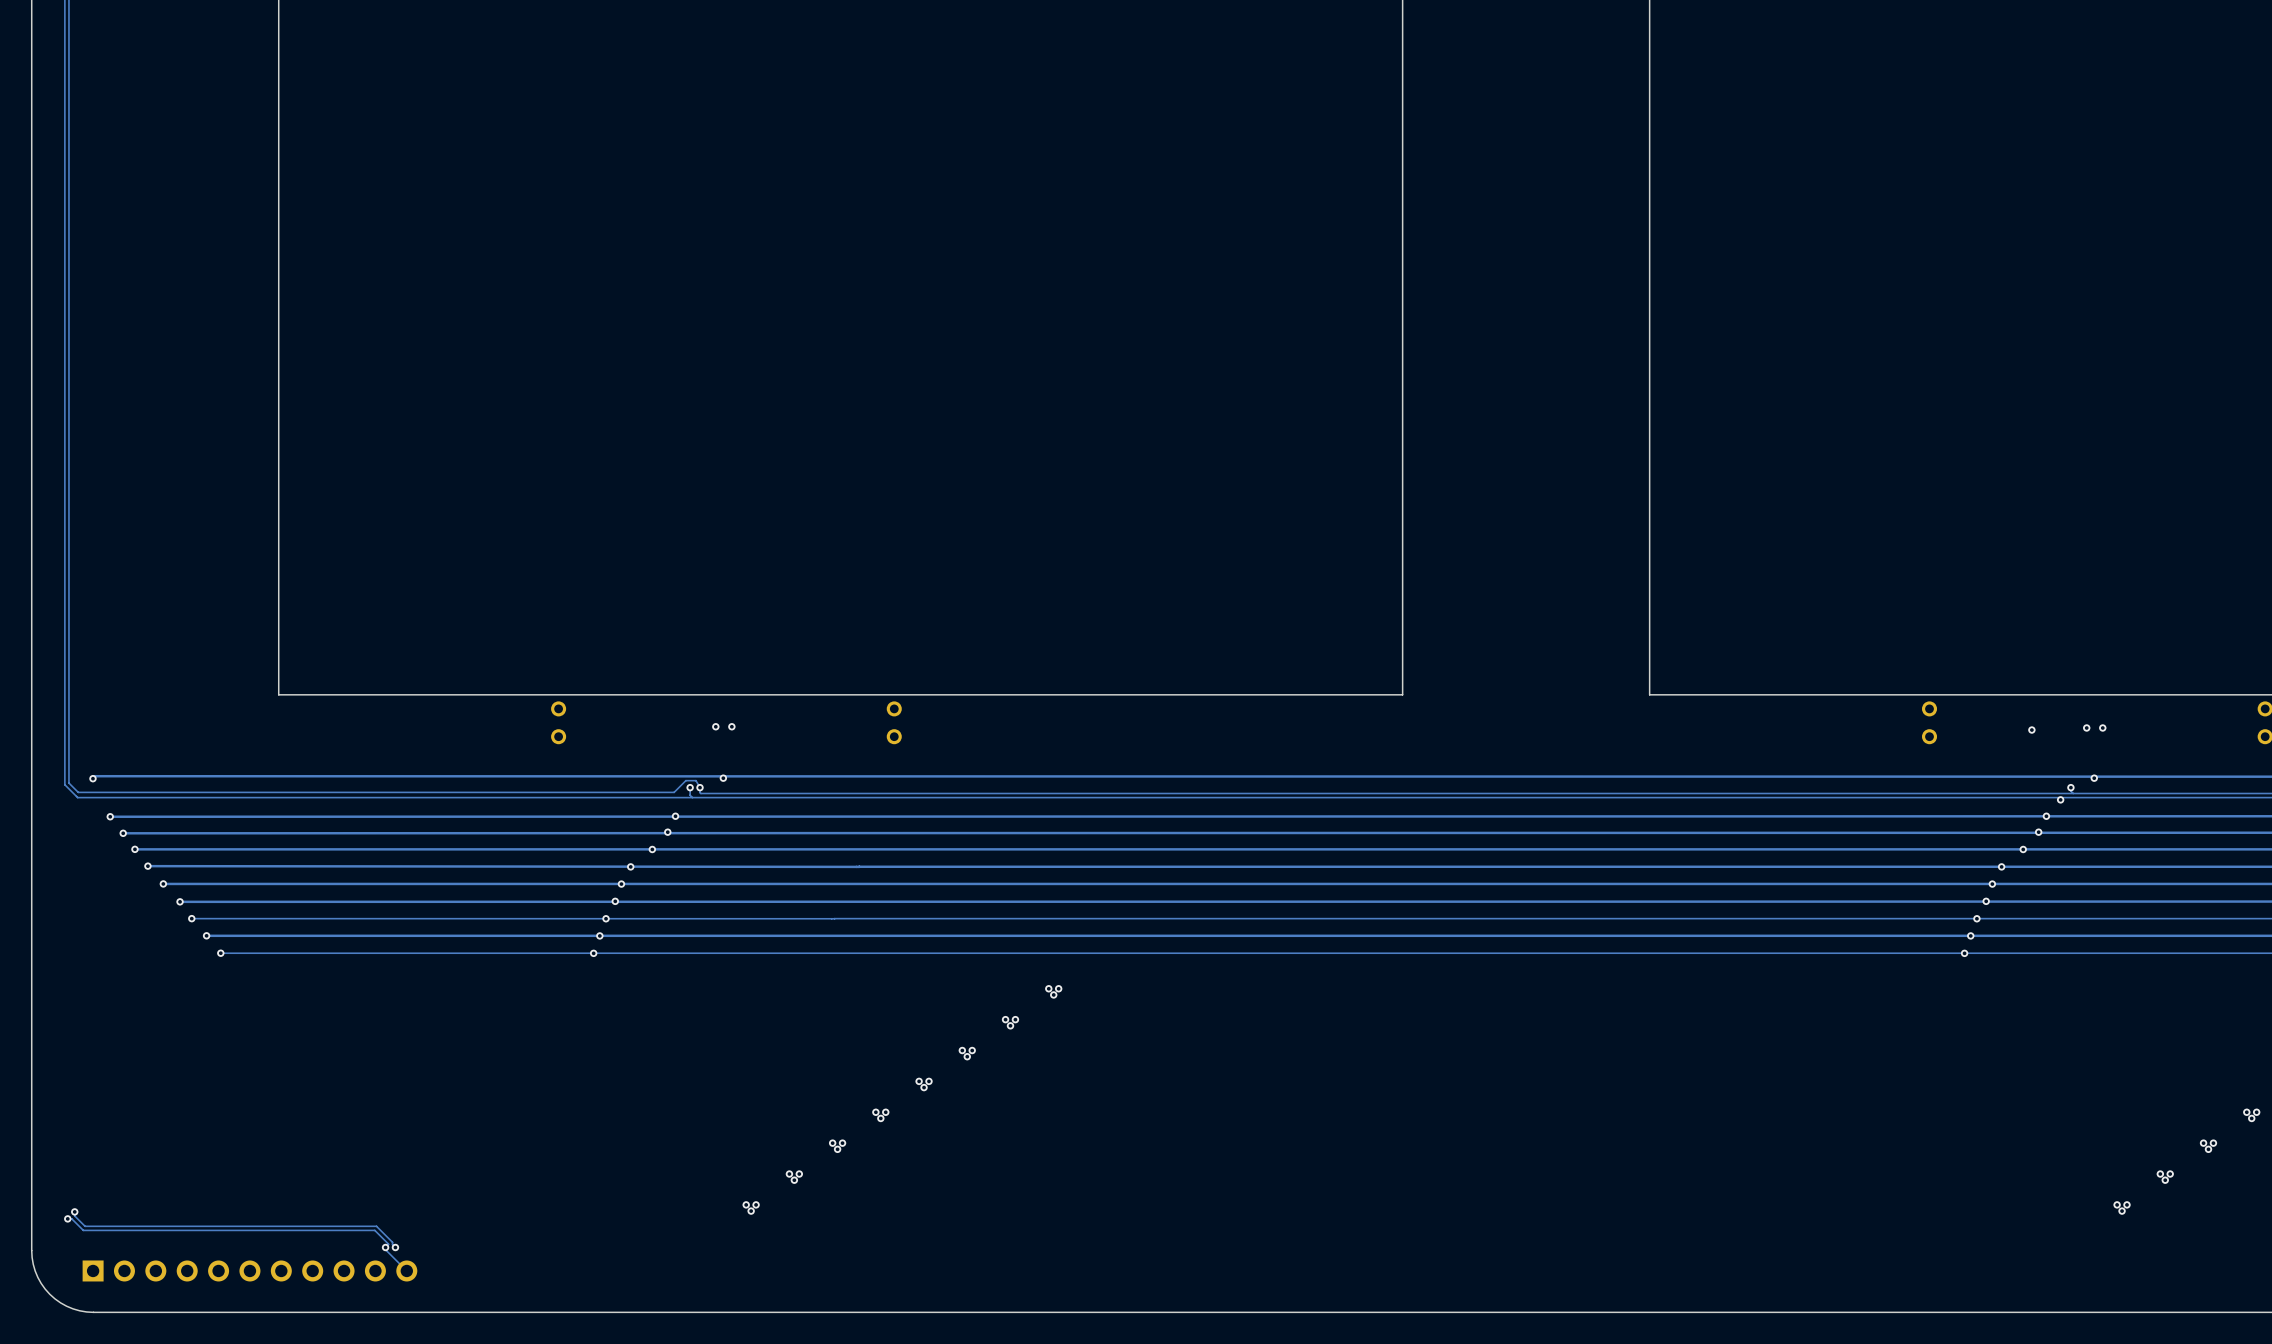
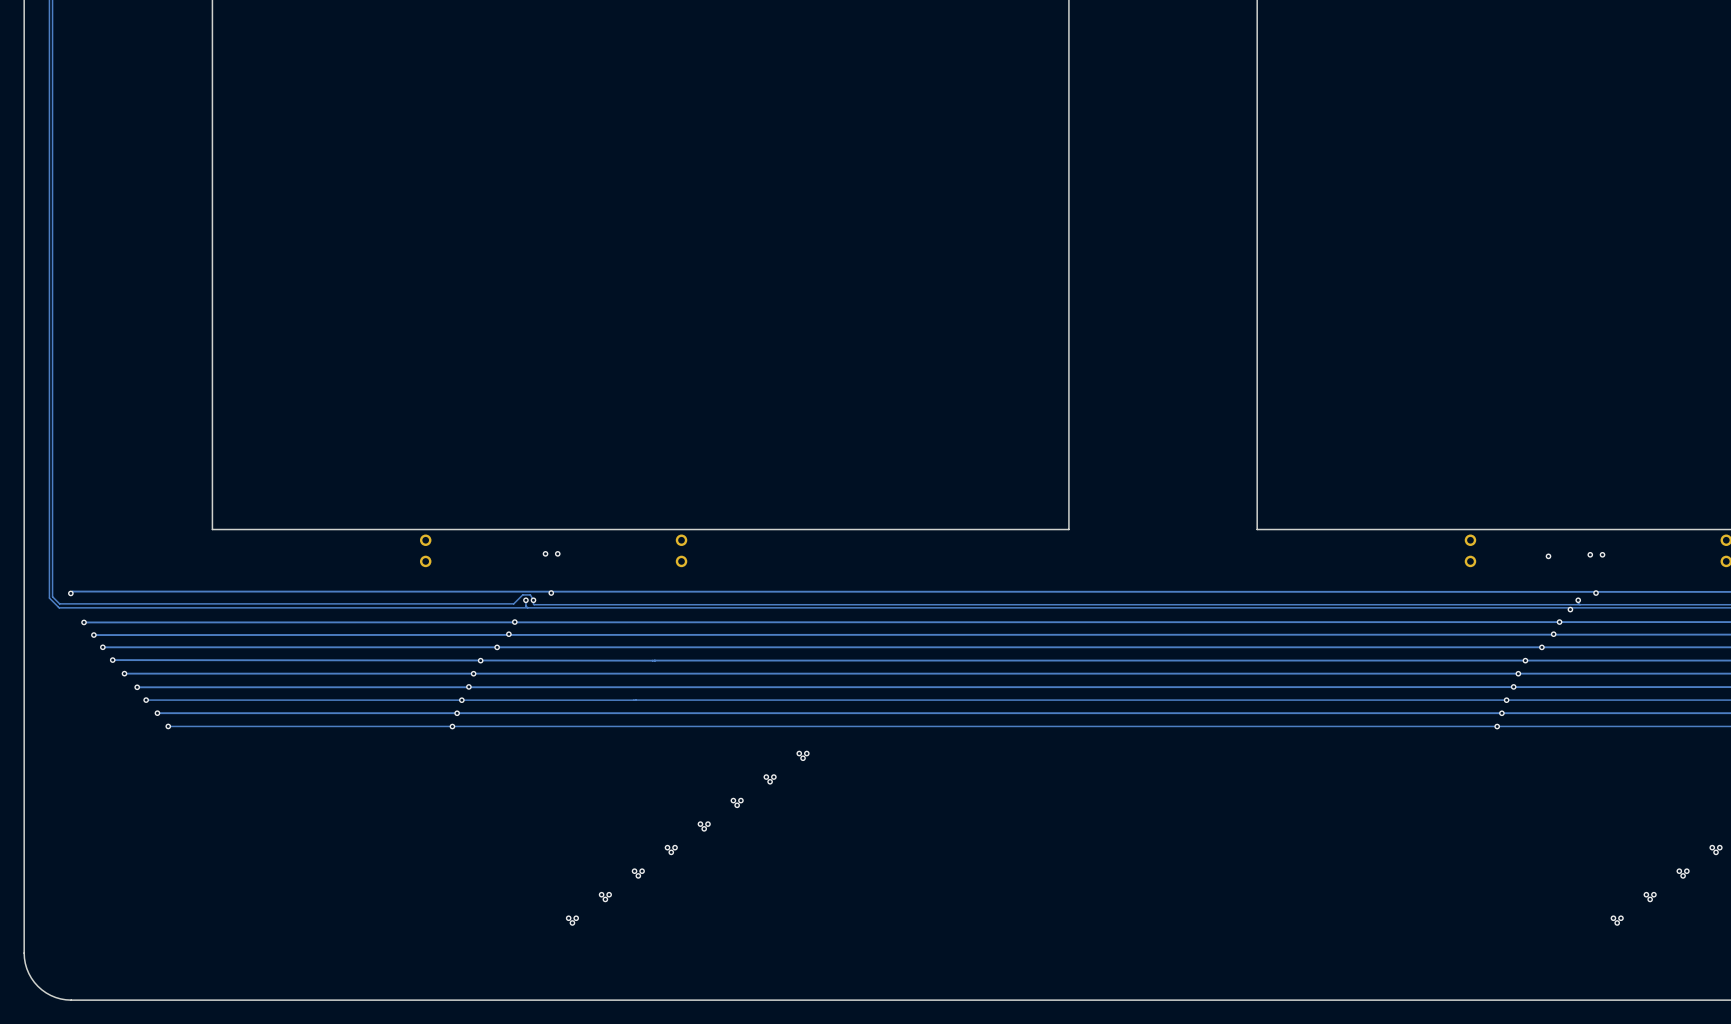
track: (74, 1211) (74, 1215) (85, 1226) (376, 1226) (395, 1247) -> none
via: (74, 1211) -> none
track: (67, 1218) (71, 1218) (83, 1230) (374, 1230) (388, 1244) (385, 1249) (406, 1270) -> none
via: (67, 1218) -> none
via: (385, 1247) -> none
via: (395, 1247) -> none
part: (249, 1270) -> none

